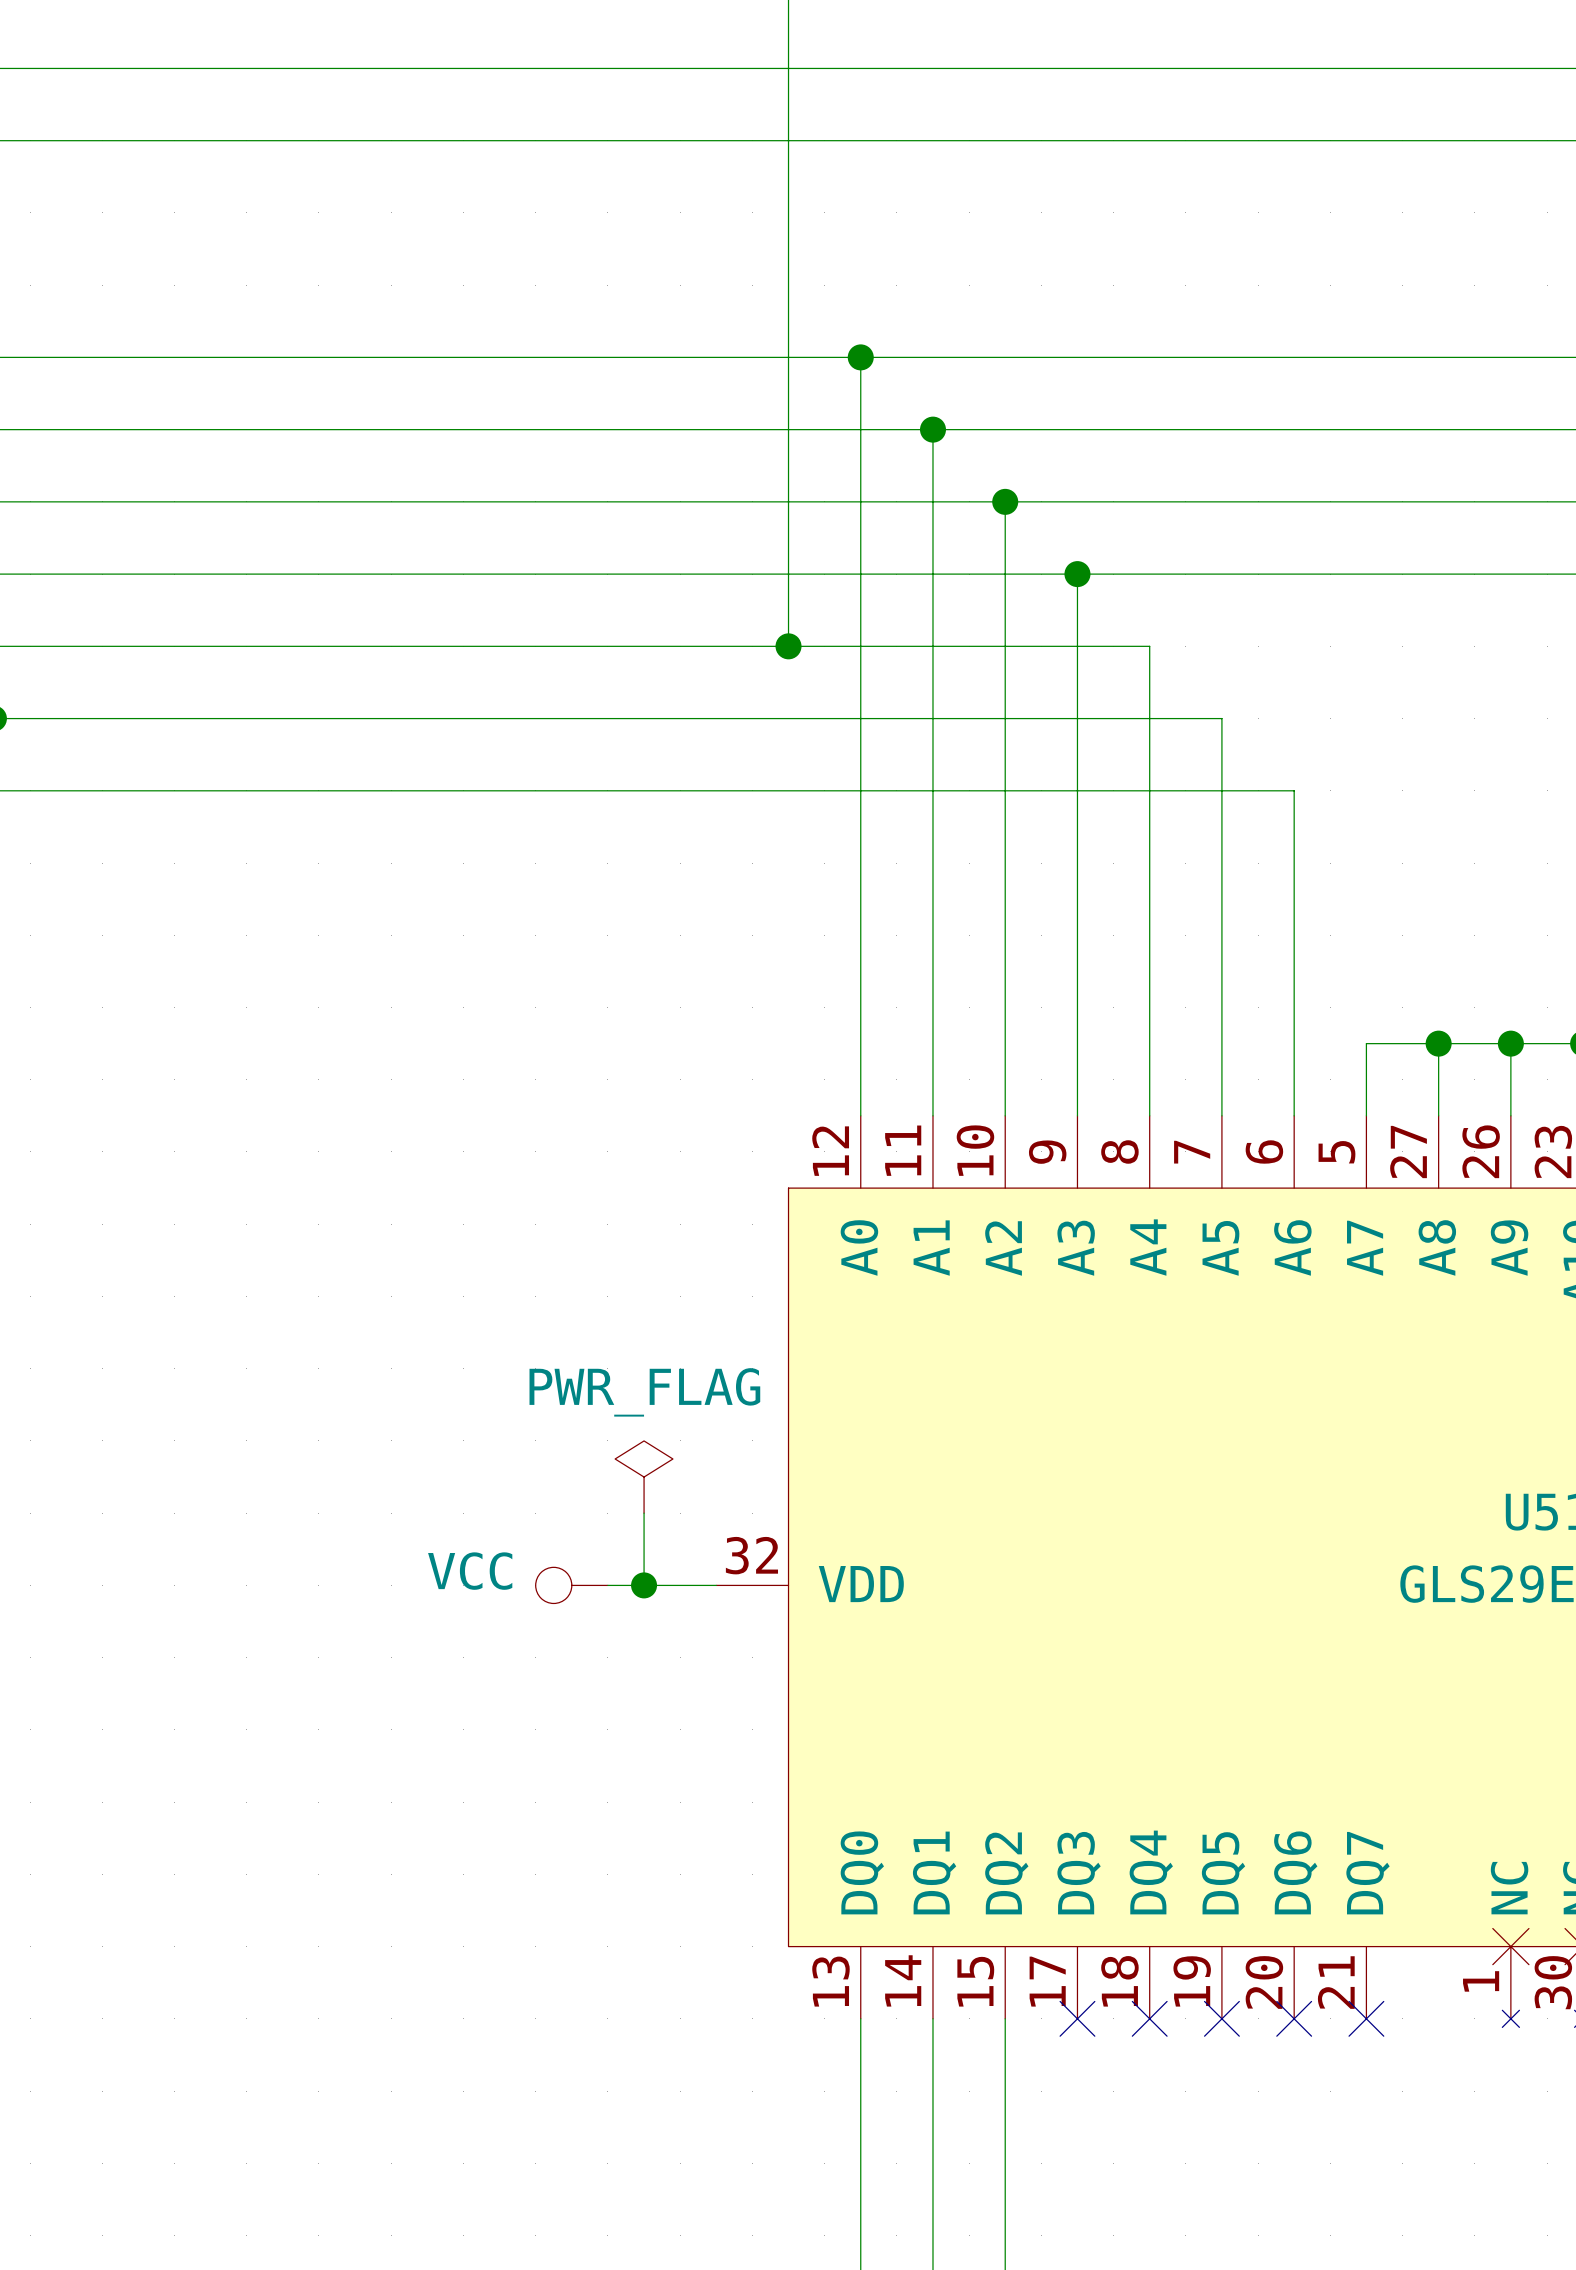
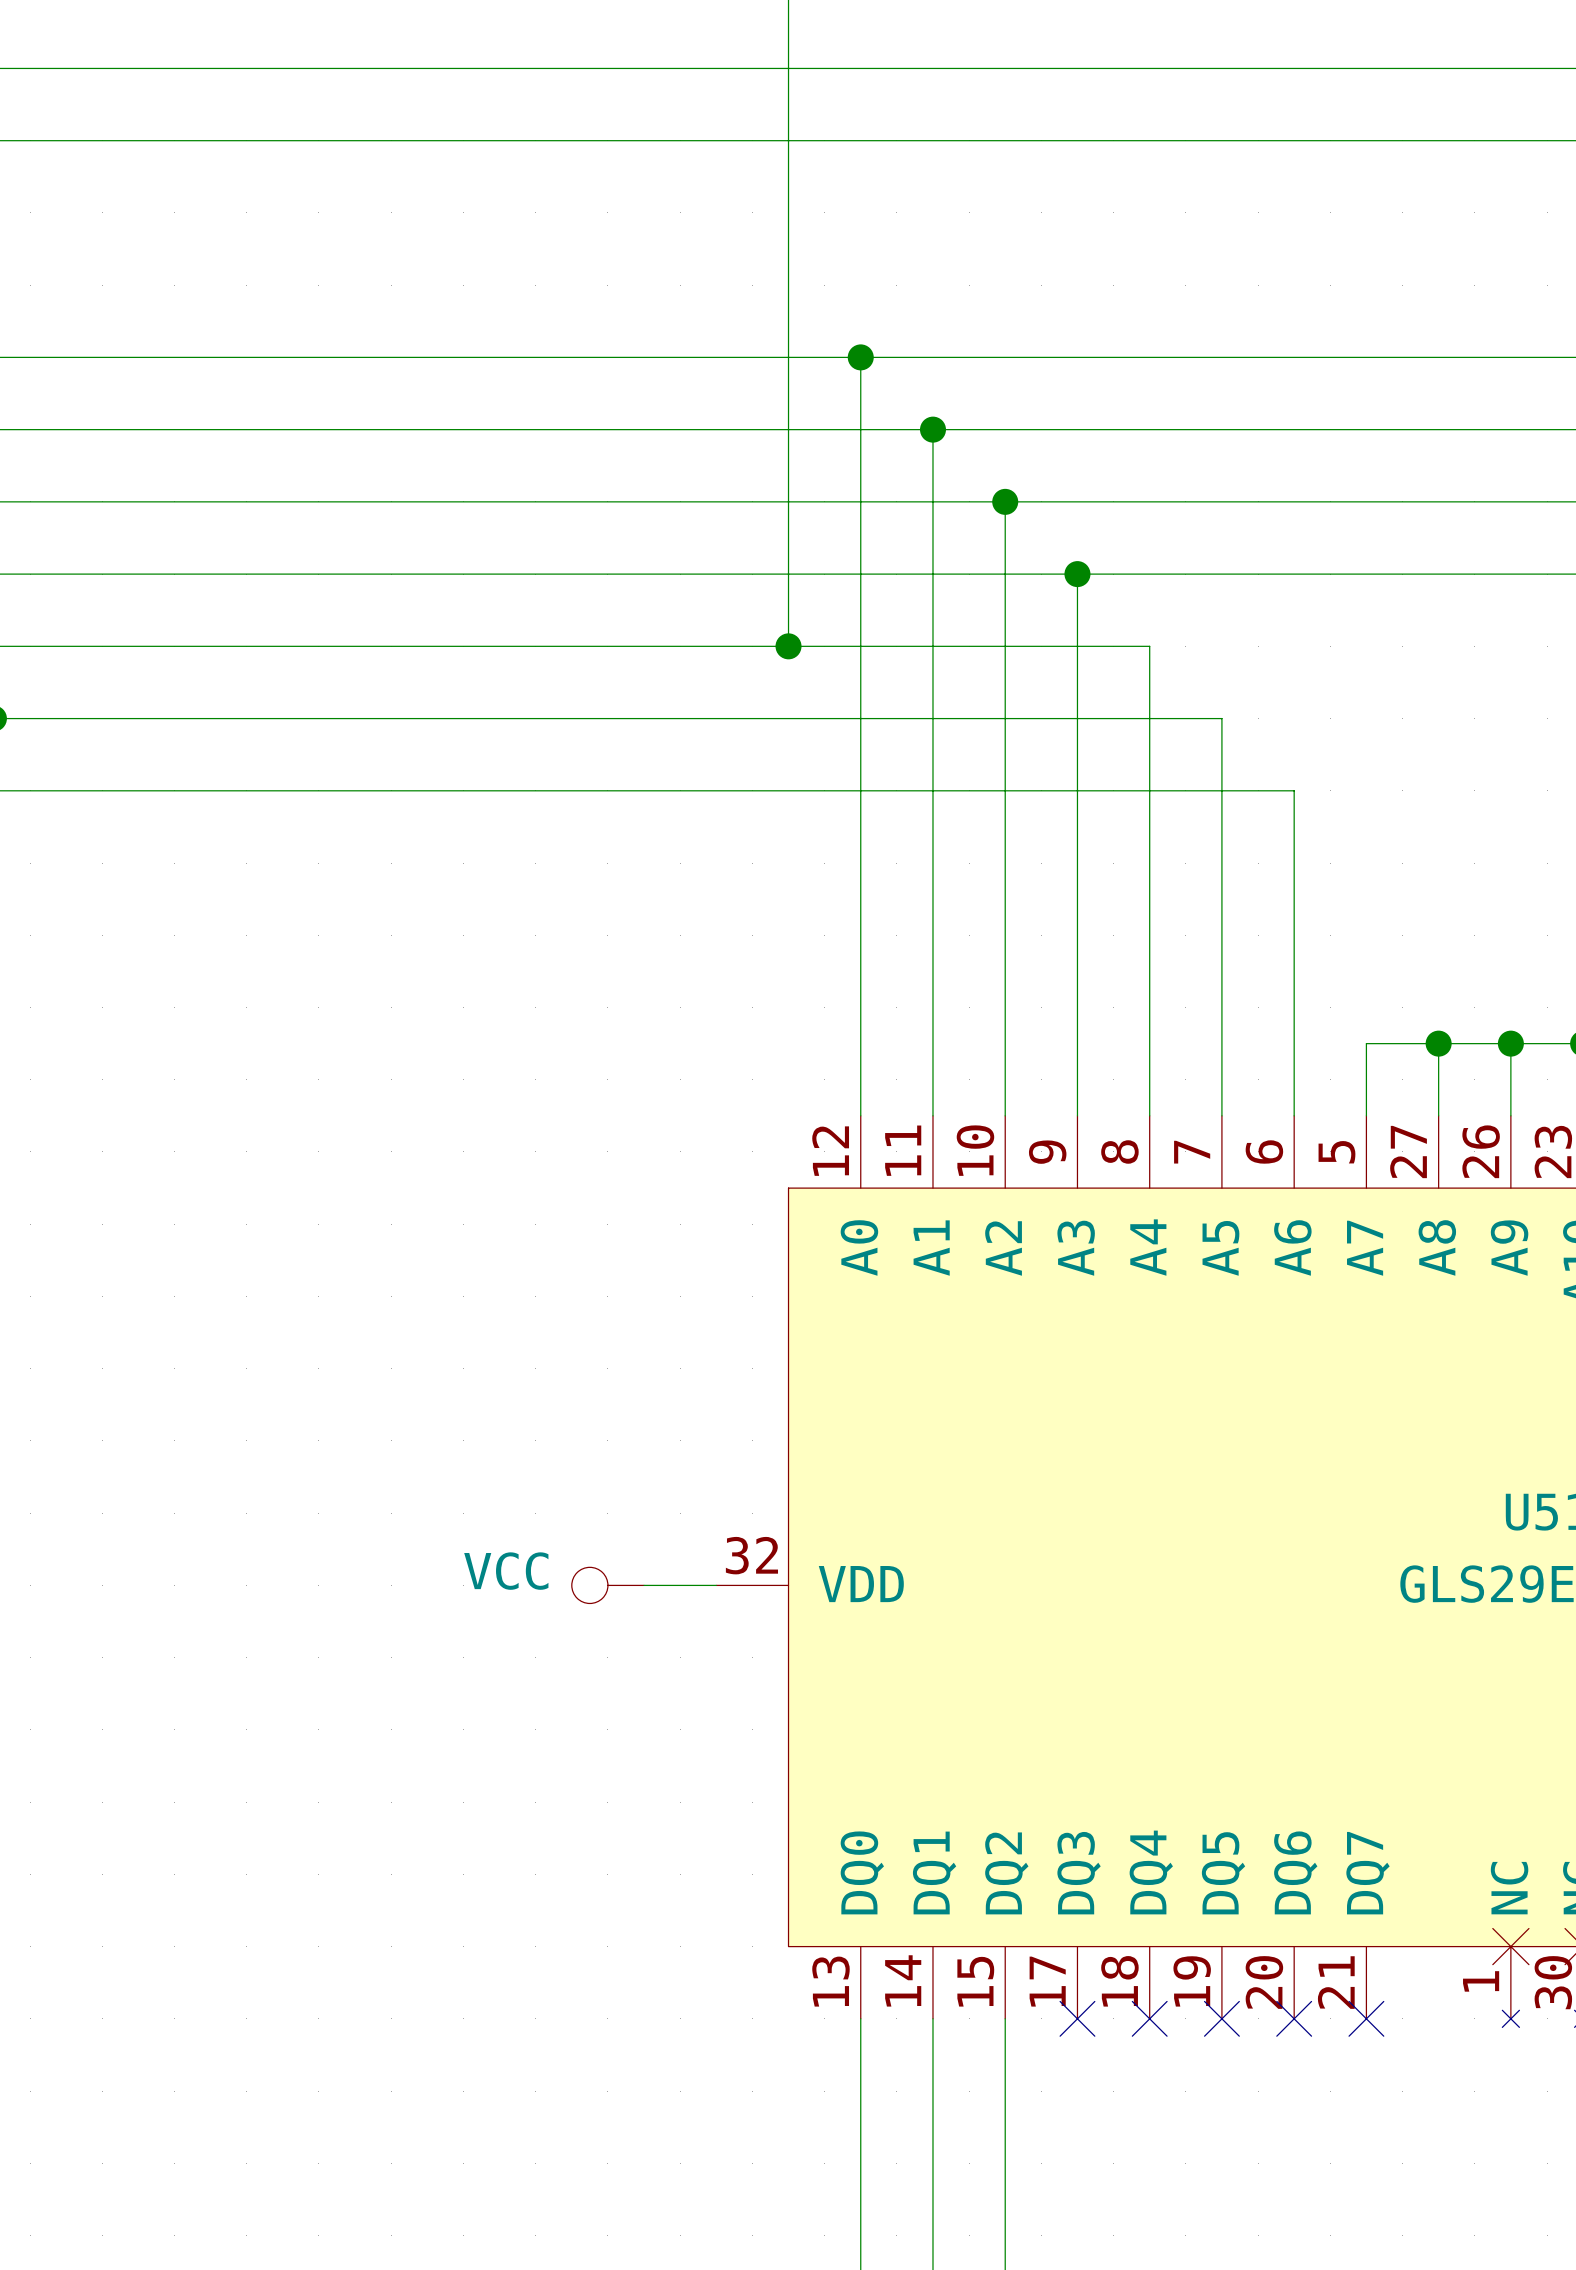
power symbol: PWR_FLAG (644, 1477) -> none
wire: (644, 1513) (644, 1585) (607, 1585) -> none
power symbol position: VCC (571, 1585) -> VCC (607, 1585)
junction: (644, 1585) -> none

